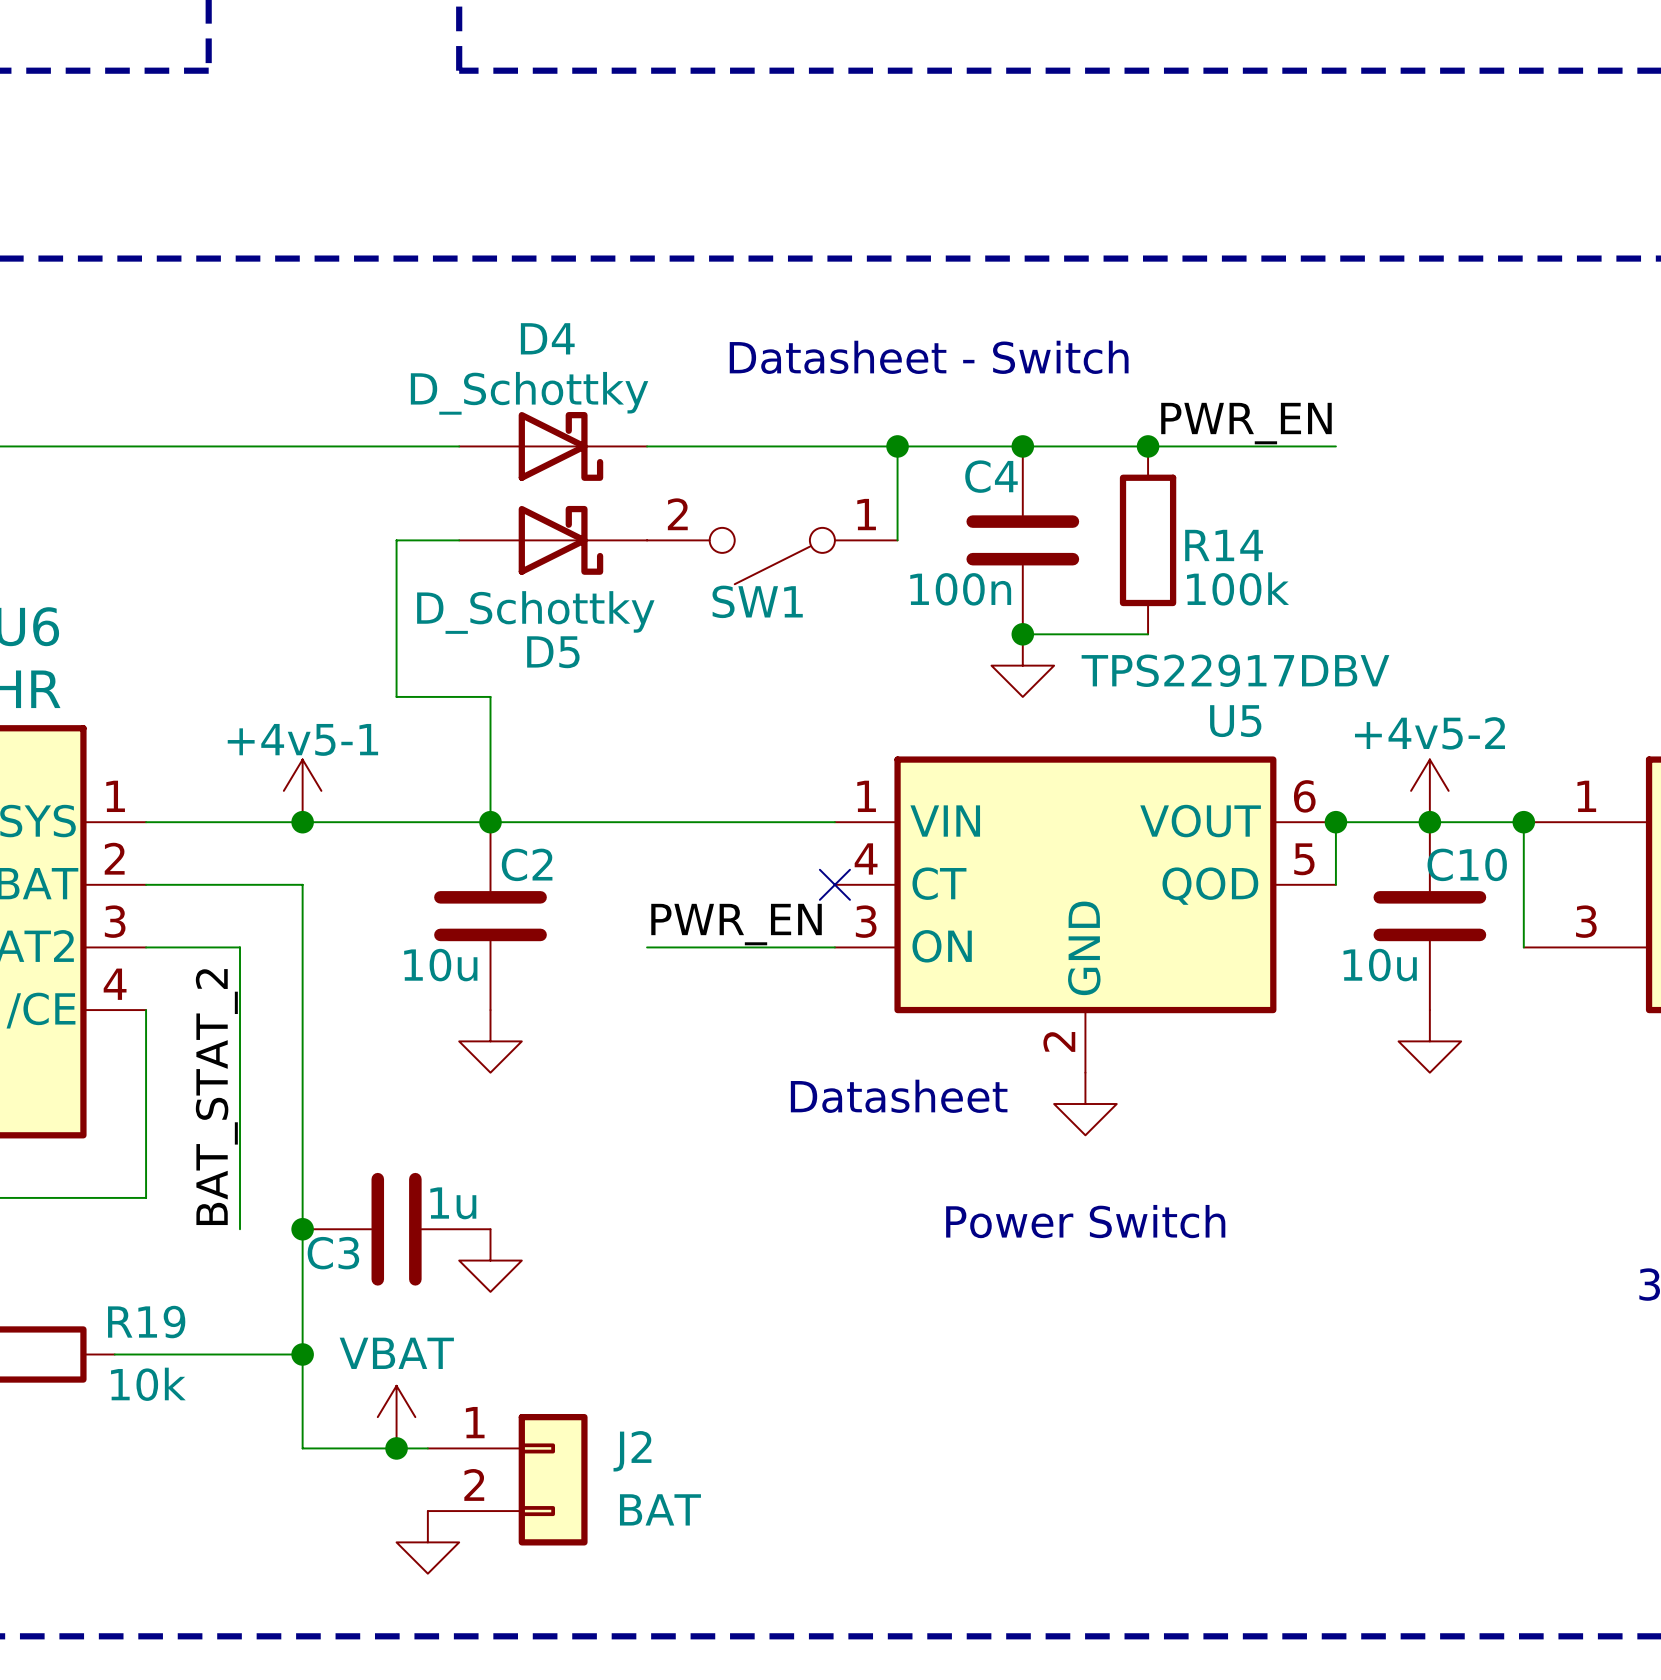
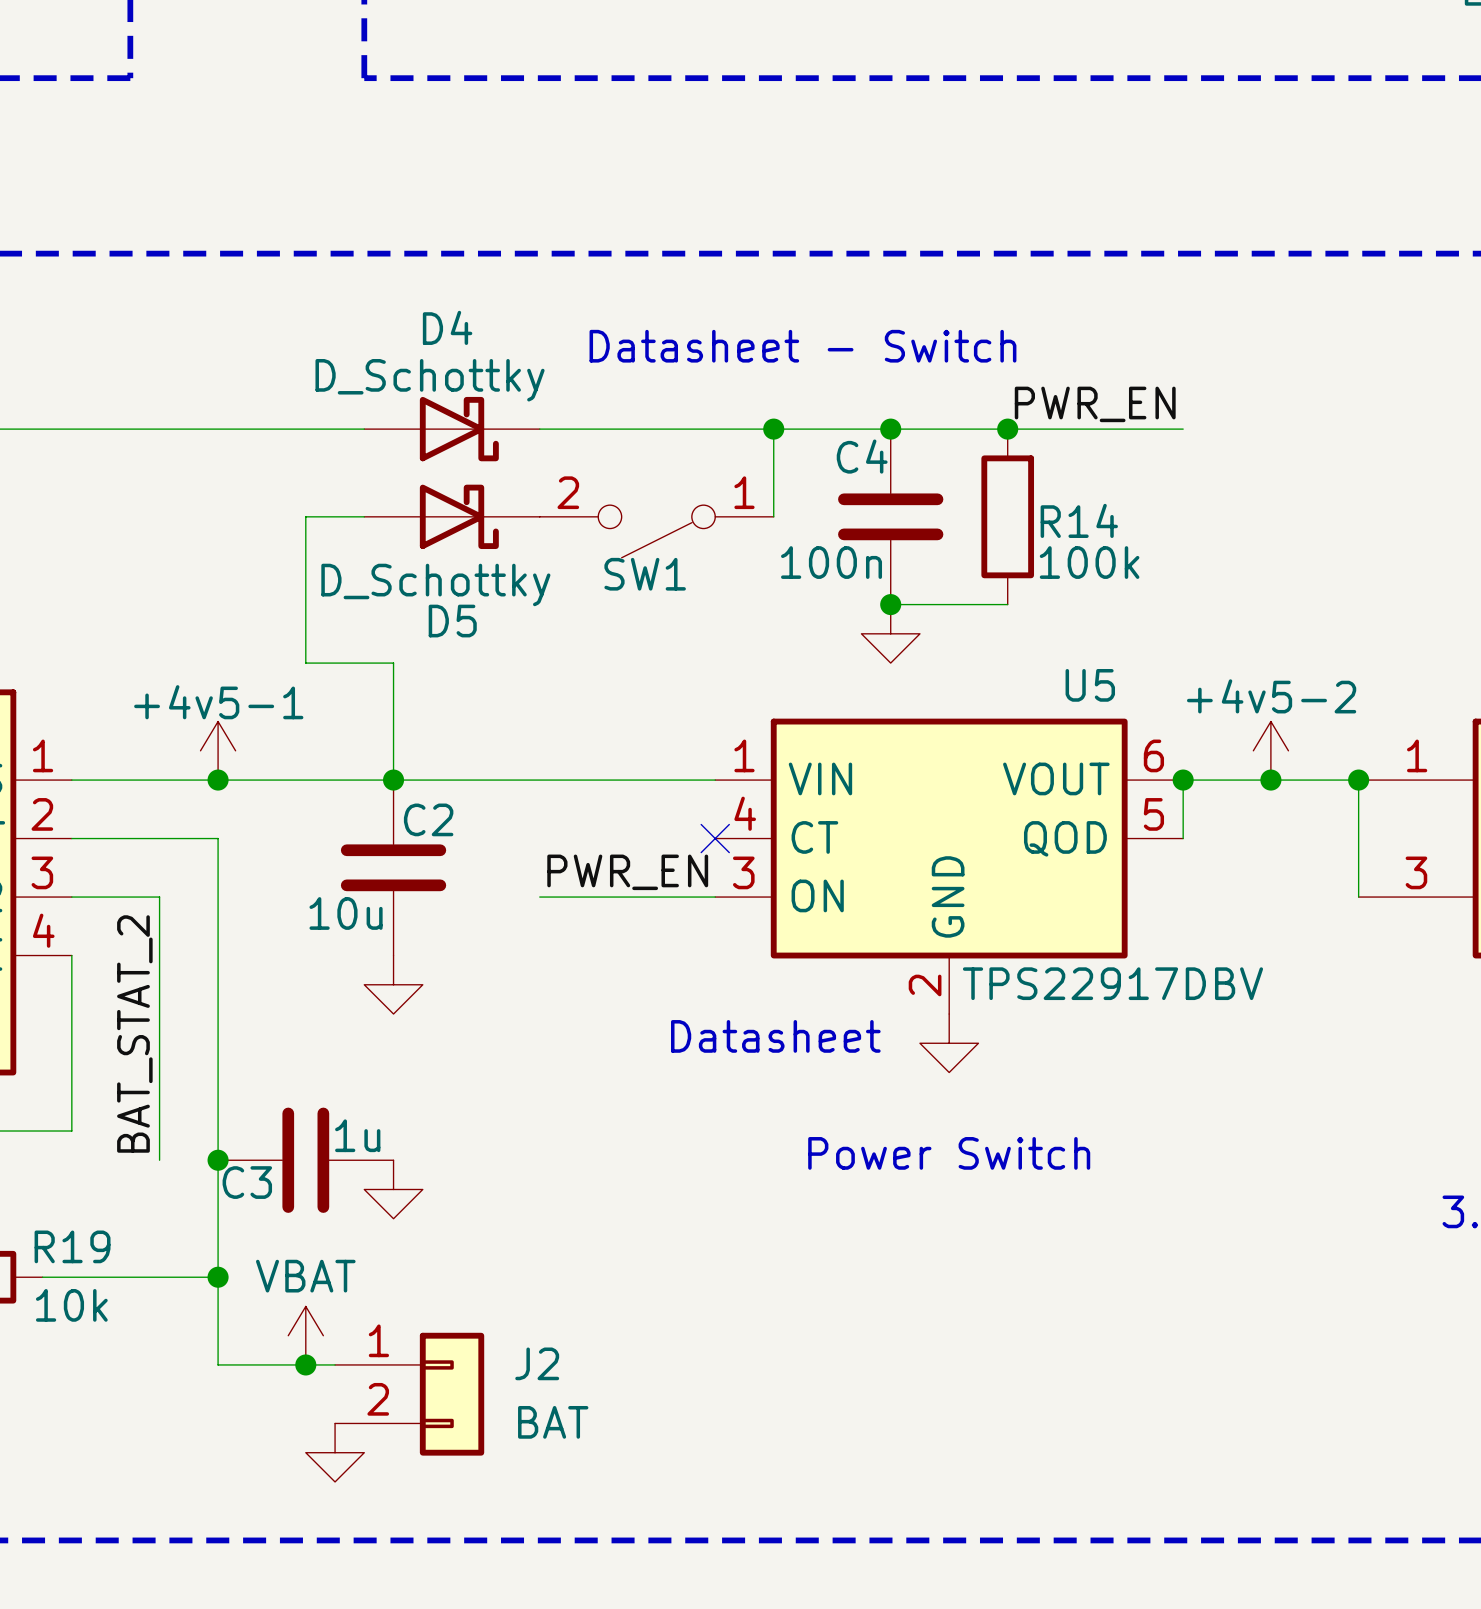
U5 value position: TPS22917DBV (1235, 670) -> TPS22917DBV (1112, 983)
C10: 10u (1429, 916) -> none
power symbol: (1429, 1041) -> none

